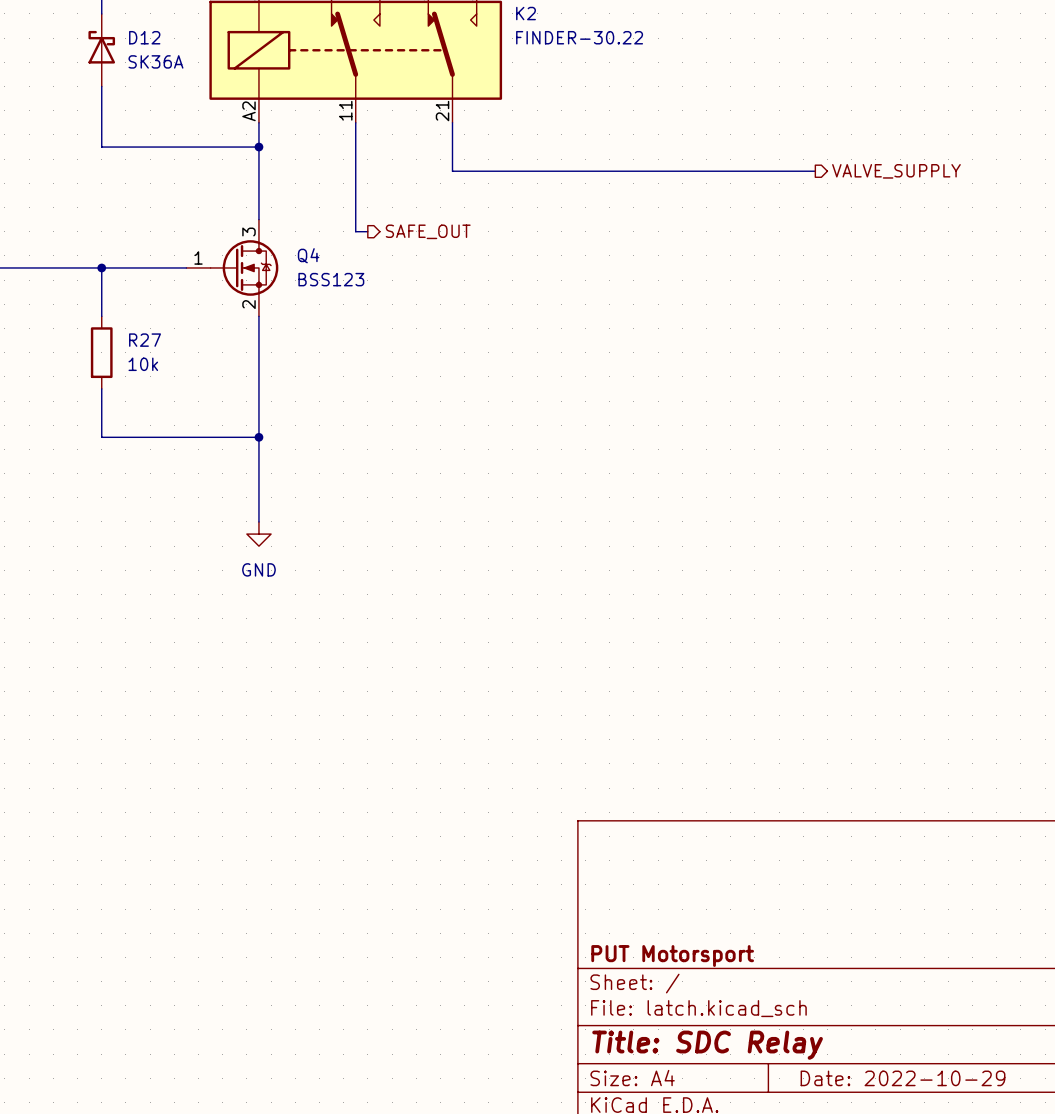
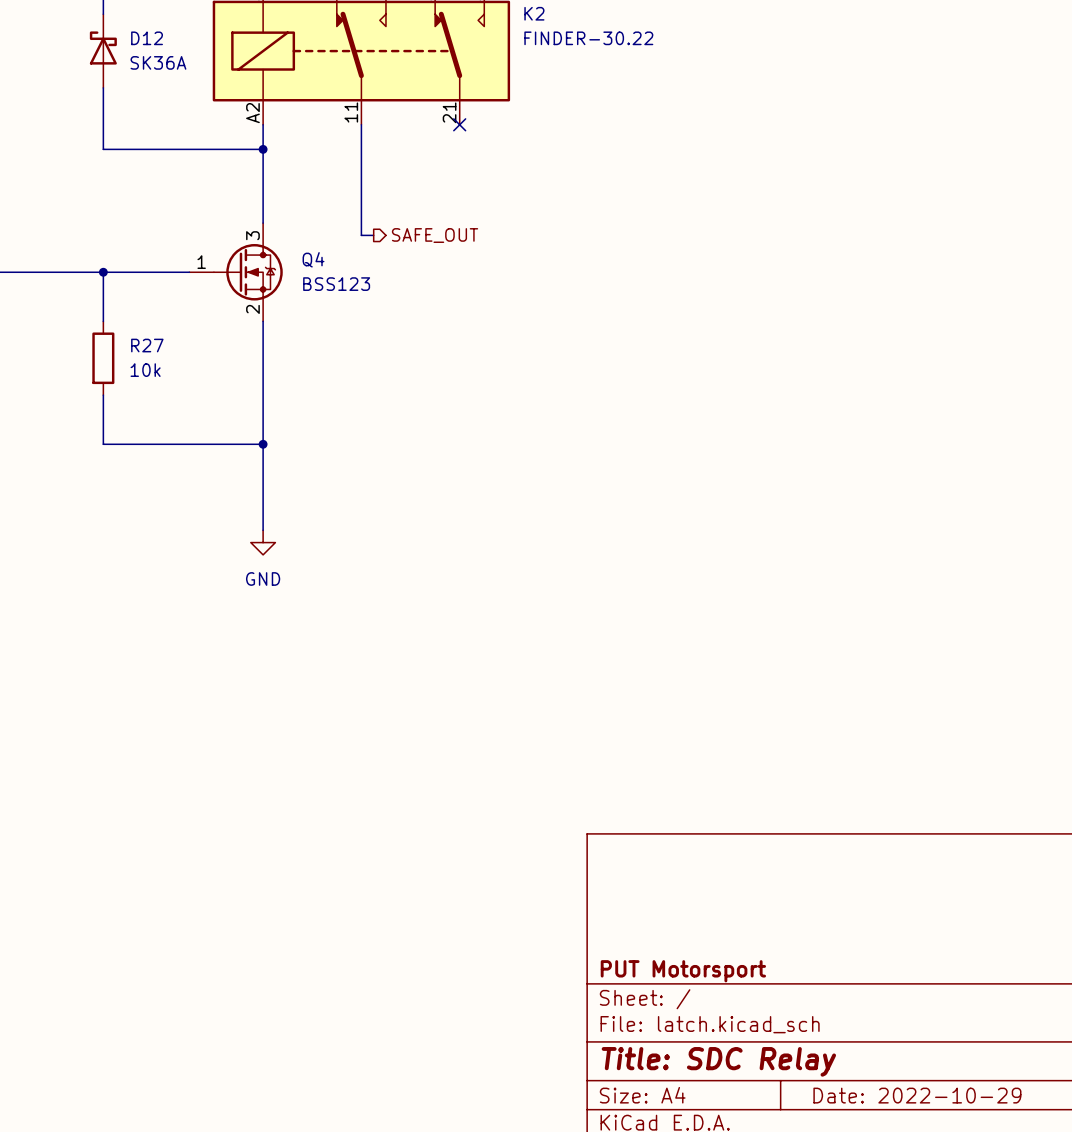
wire: (452, 122) (452, 171) (815, 171) -> none
no-connect mark: none -> (459, 124)
hierarchical label: VALVE_SUPPLY (896, 171) -> none

